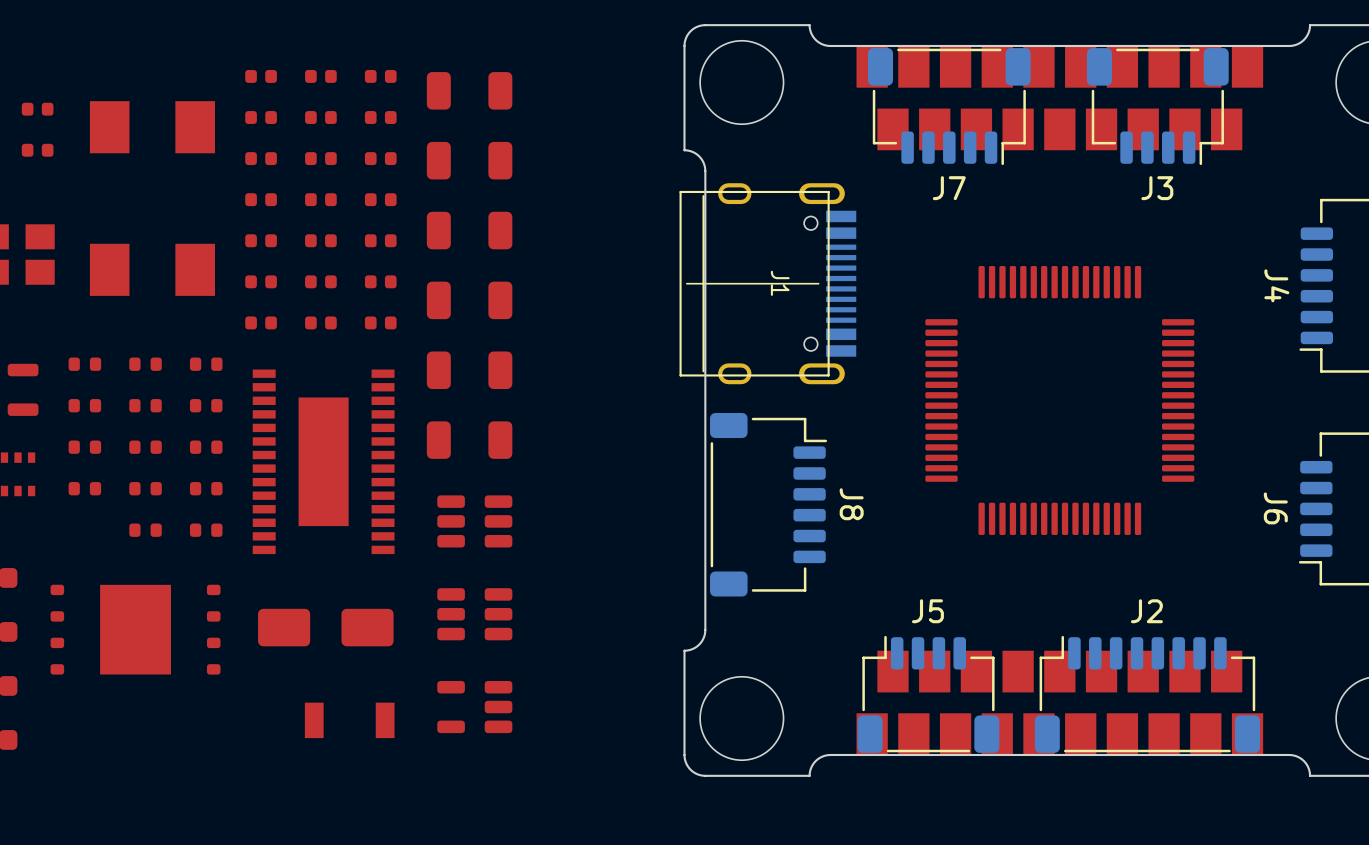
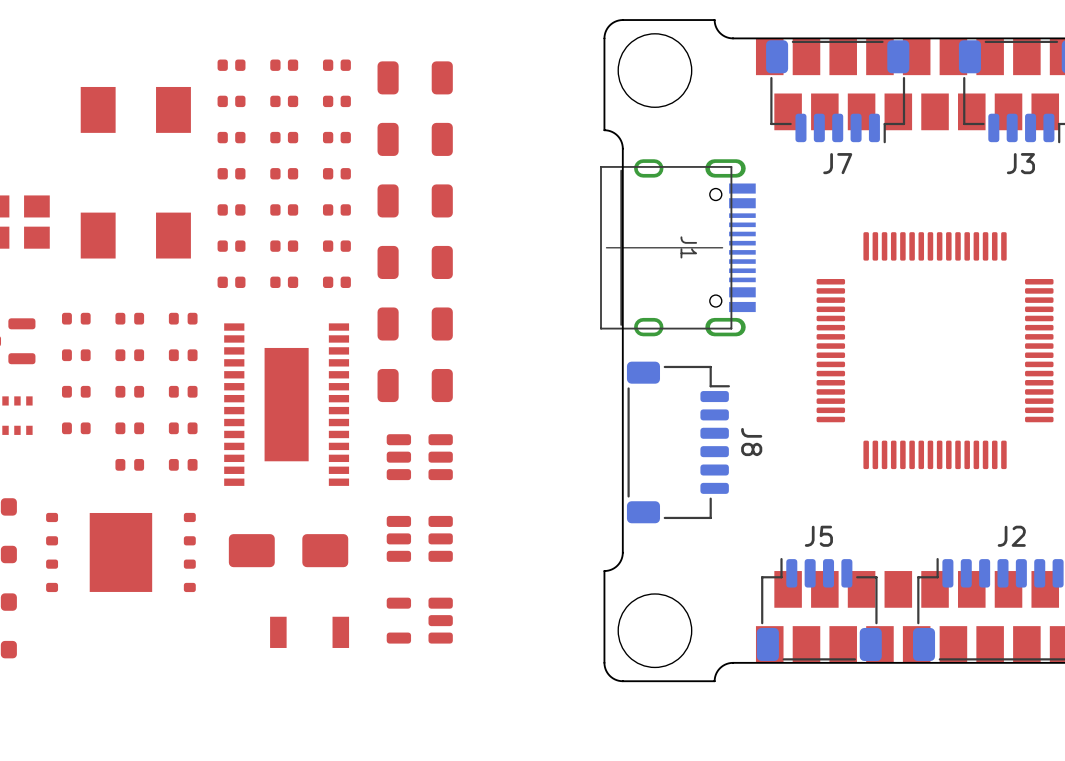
part: (37, 109) -> none
part: (37, 150) -> none

